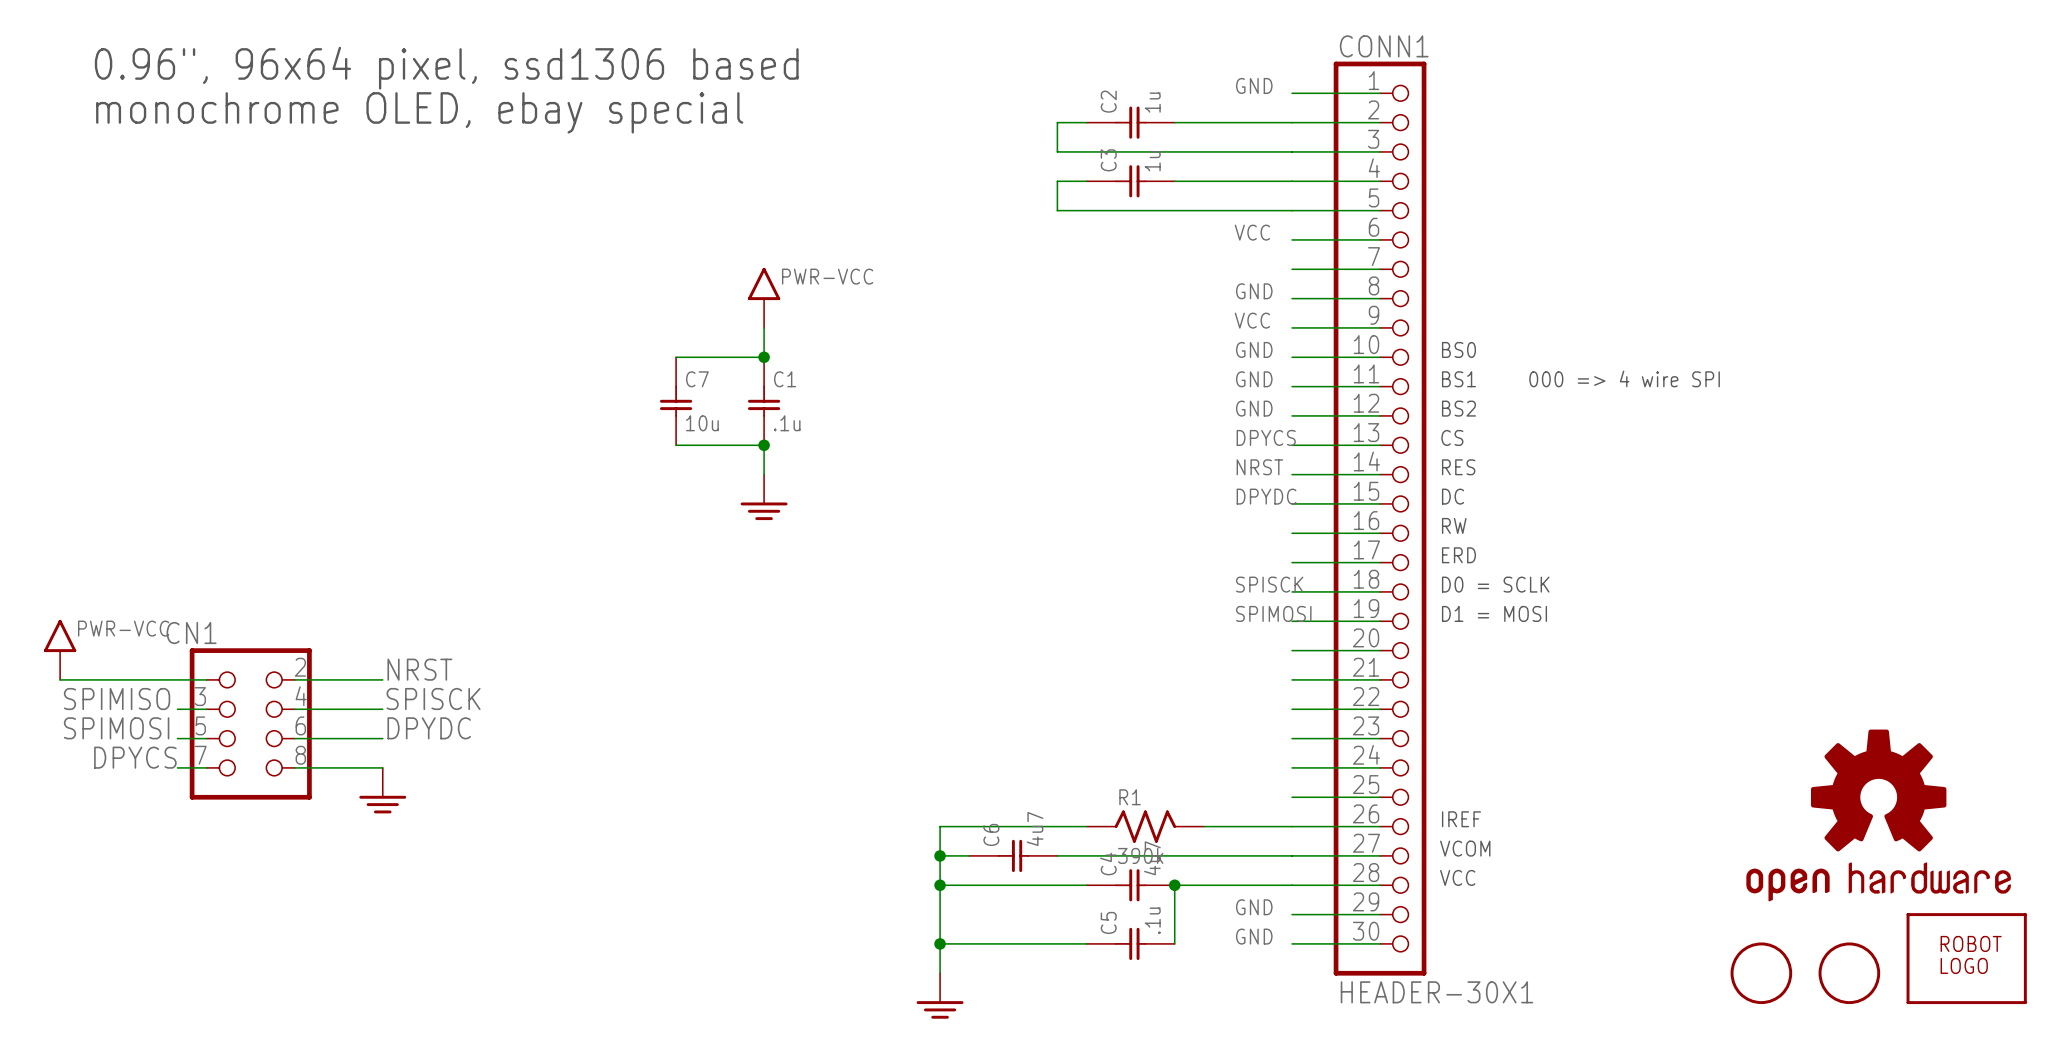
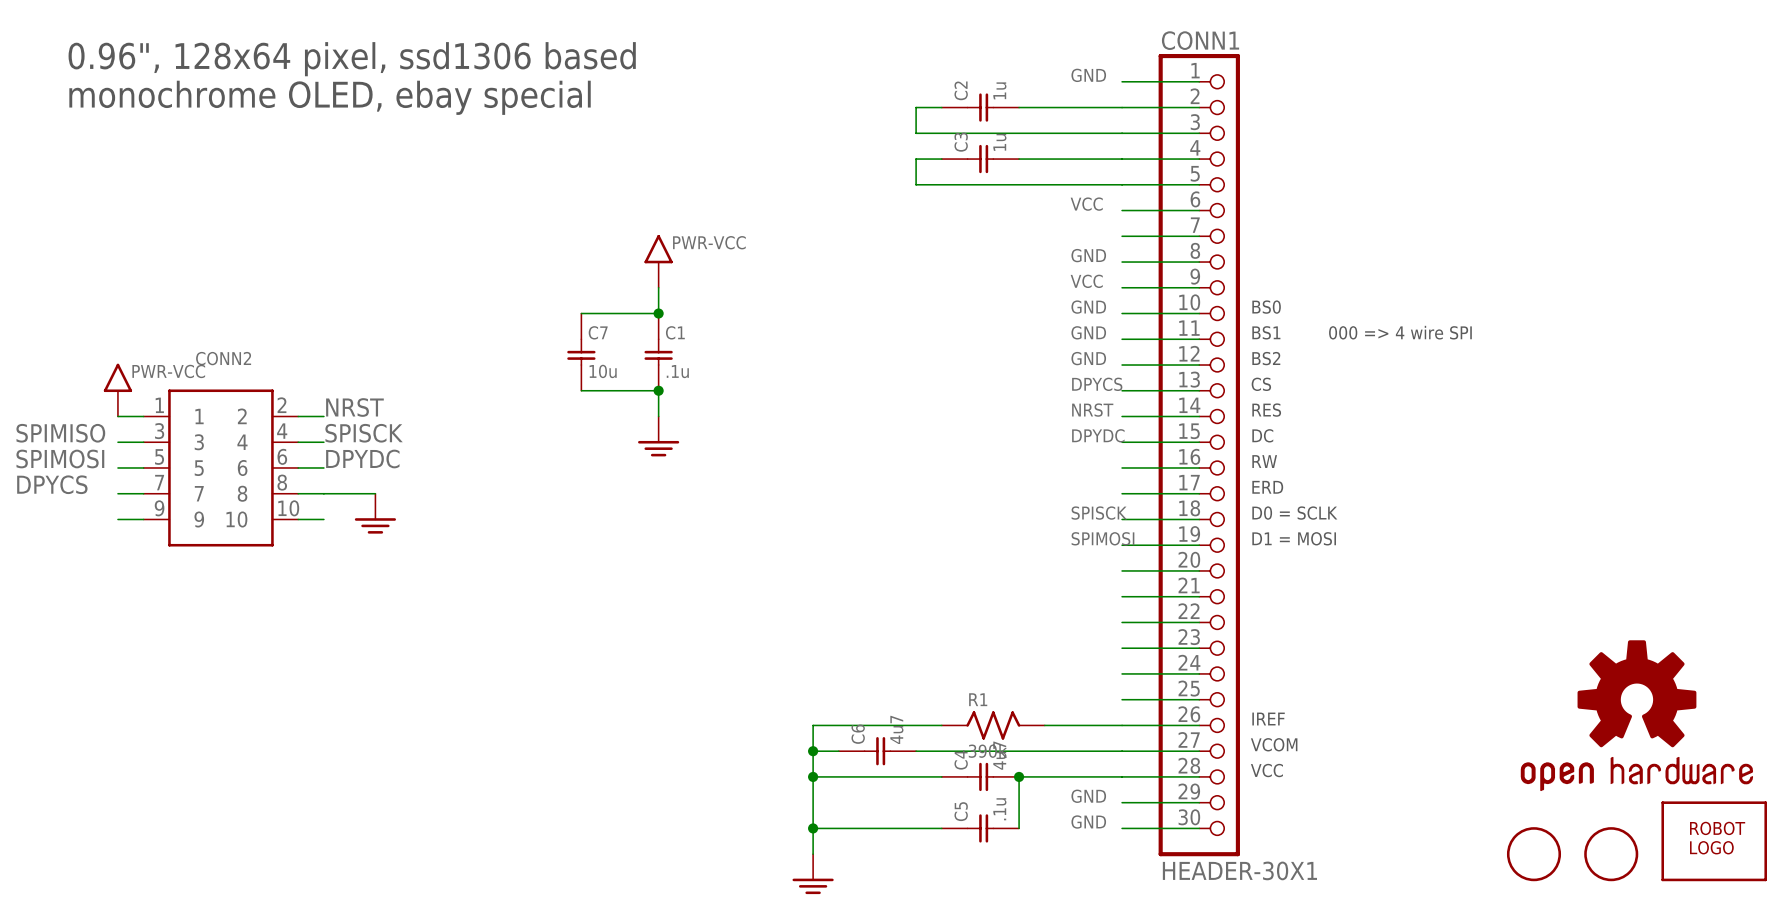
text: 0.96", 96x64 pixel, ssd1306 based (446, 68) -> 0.96", 128x64 pixel, ssd1306 based (352, 59)
wire: none -> (117, 416) (143, 416)
wire: none -> (298, 416) (323, 416)
wire: none -> (117, 442) (143, 442)
wire: none -> (298, 442) (323, 442)
CONN2: none -> (220, 467)
wire: none -> (298, 467) (323, 467)
wire: none -> (298, 519) (323, 519)
power symbol position: PWR-VCC (60, 649) -> PWR-VCC (117, 390)
label position: NRST (419, 669) -> NRST (354, 407)
wire: (60, 679) (206, 679) -> none
wire: (294, 679) (382, 679) -> (298, 493) (375, 493)
label position: SPIMISO (117, 699) -> SPIMISO (60, 433)
label position: SPISCK (433, 699) -> SPISCK (364, 433)
wire: (177, 709) (206, 709) -> (117, 467) (143, 467)
wire: (294, 709) (382, 709) -> none
CN1: (250, 723) -> none
label position: SPIMOSI (116, 728) -> SPIMOSI (60, 458)
label position: DPYDC (429, 728) -> DPYDC (362, 458)
wire: (177, 738) (206, 738) -> (117, 493) (143, 493)
wire: (294, 738) (382, 738) -> none
label position: DPYCS (135, 757) -> DPYCS (52, 484)
wire: (177, 767) (206, 767) -> (117, 519) (143, 519)
wire: (294, 767) (382, 767) -> none
power symbol position: (382, 790) -> (375, 513)

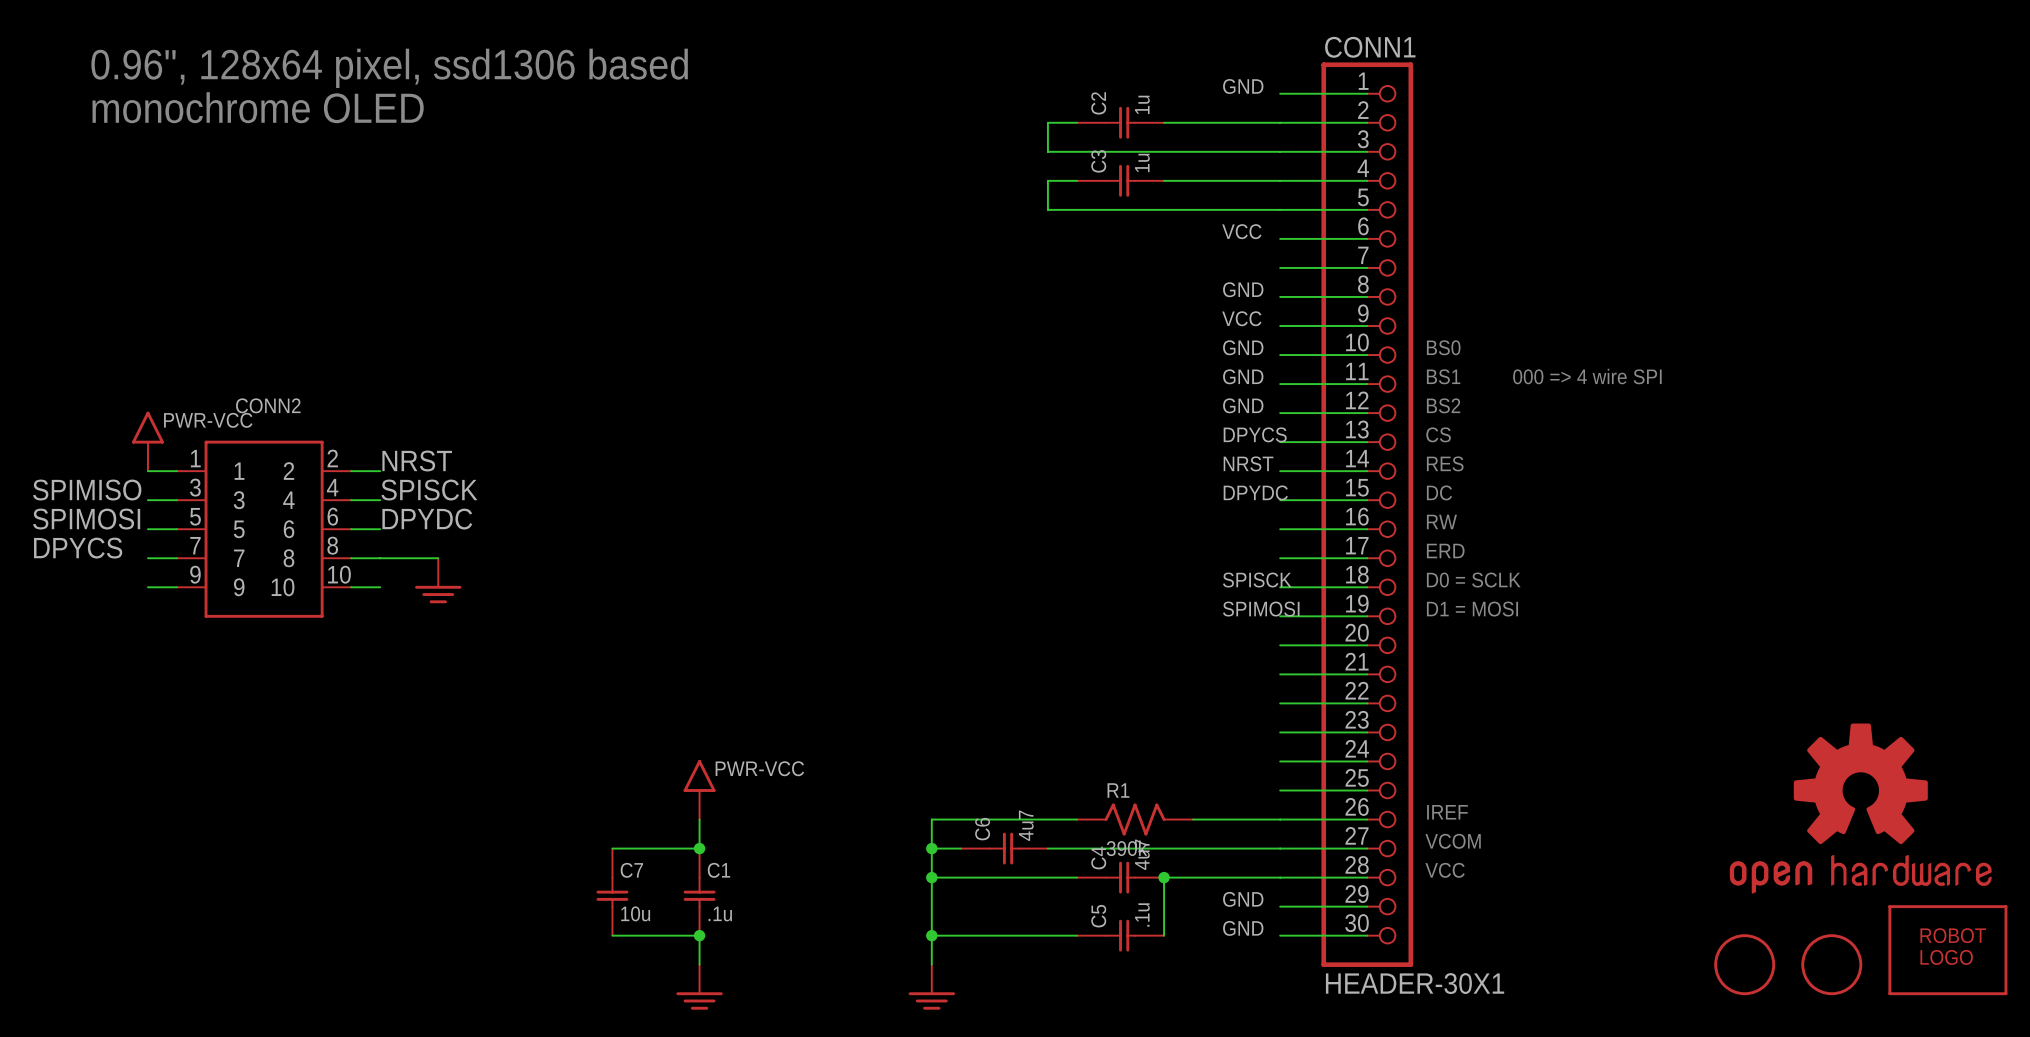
text: monochrome OLED, ebay special (330, 97) -> monochrome OLED (258, 107)
power symbol: PWR-VCC (658, 261) -> none
wire: (658, 287) (658, 313) (581, 313) -> none
junction: (658, 313) -> none
C7 position: (581, 352) -> (612, 892)
C1 position: (658, 352) -> (699, 892)
wire: (581, 390) (658, 390) (658, 416) -> none
junction: (658, 390) -> none
power symbol: (658, 436) -> none
power symbol: none -> PWR-VCC (699, 789)
wire: none -> (699, 819) (699, 848) (612, 848)
junction: none -> (699, 848)
wire: none -> (612, 935) (699, 935) (699, 964)
junction: none -> (699, 935)
power symbol: none -> (699, 987)

